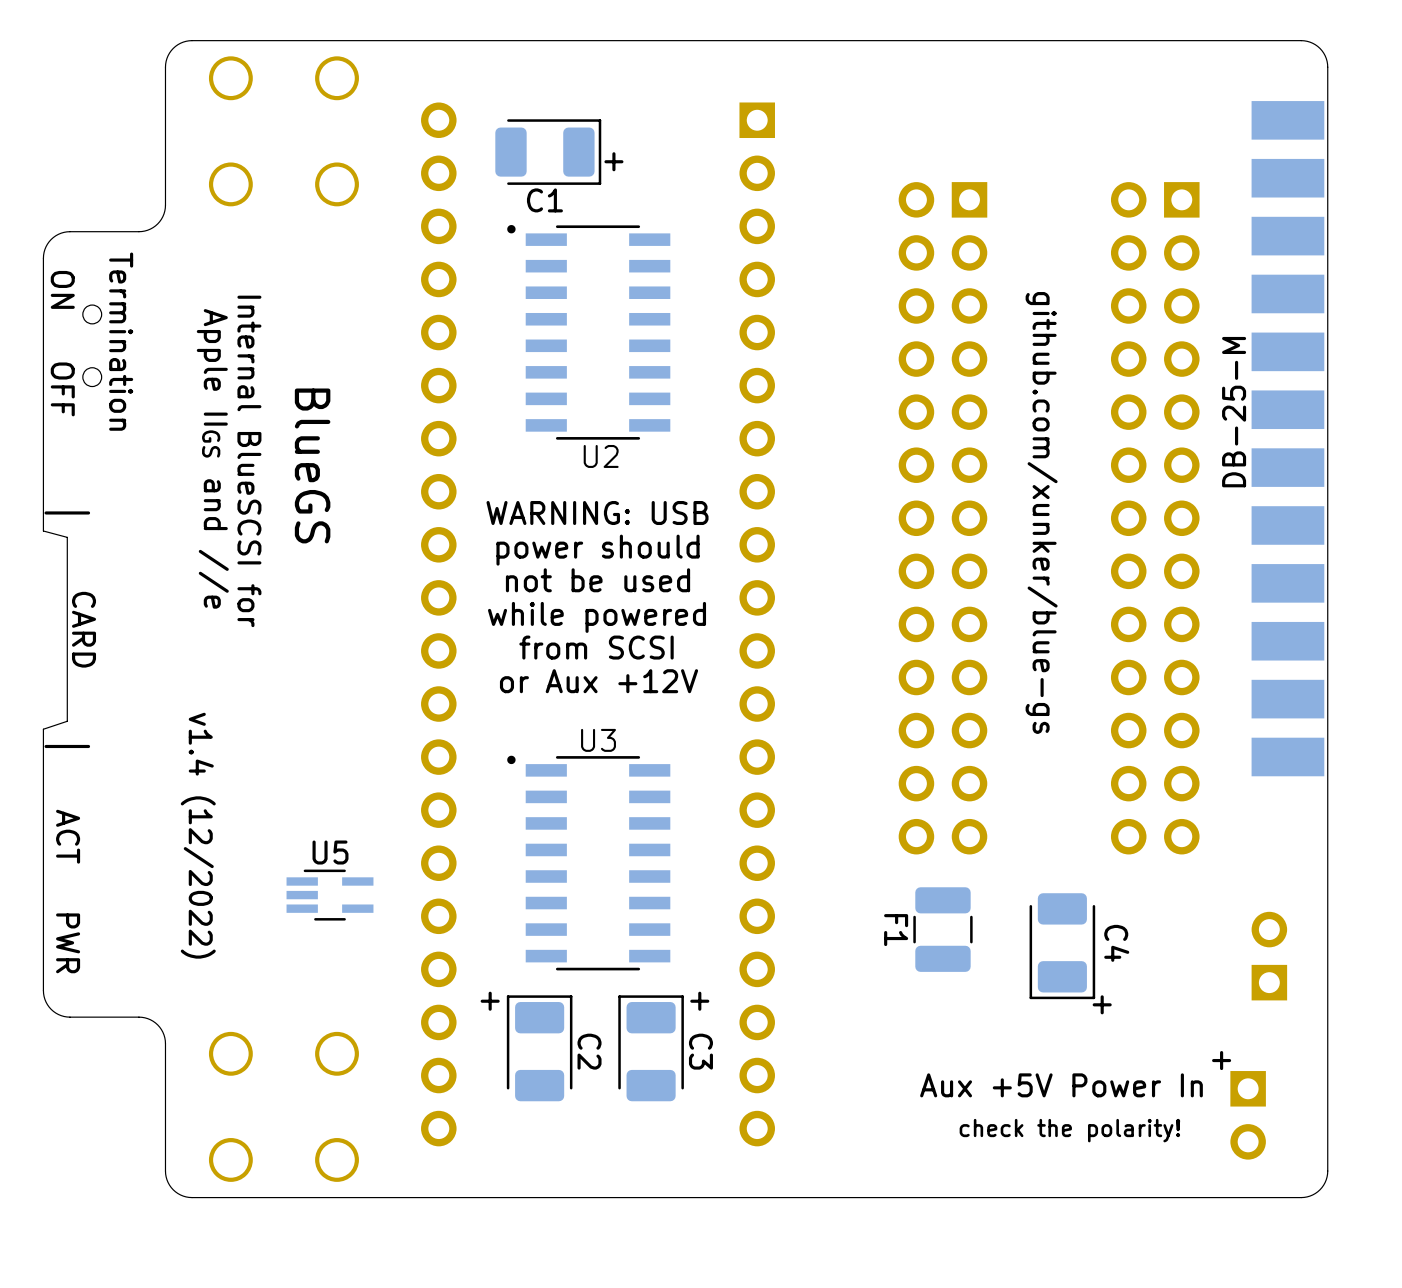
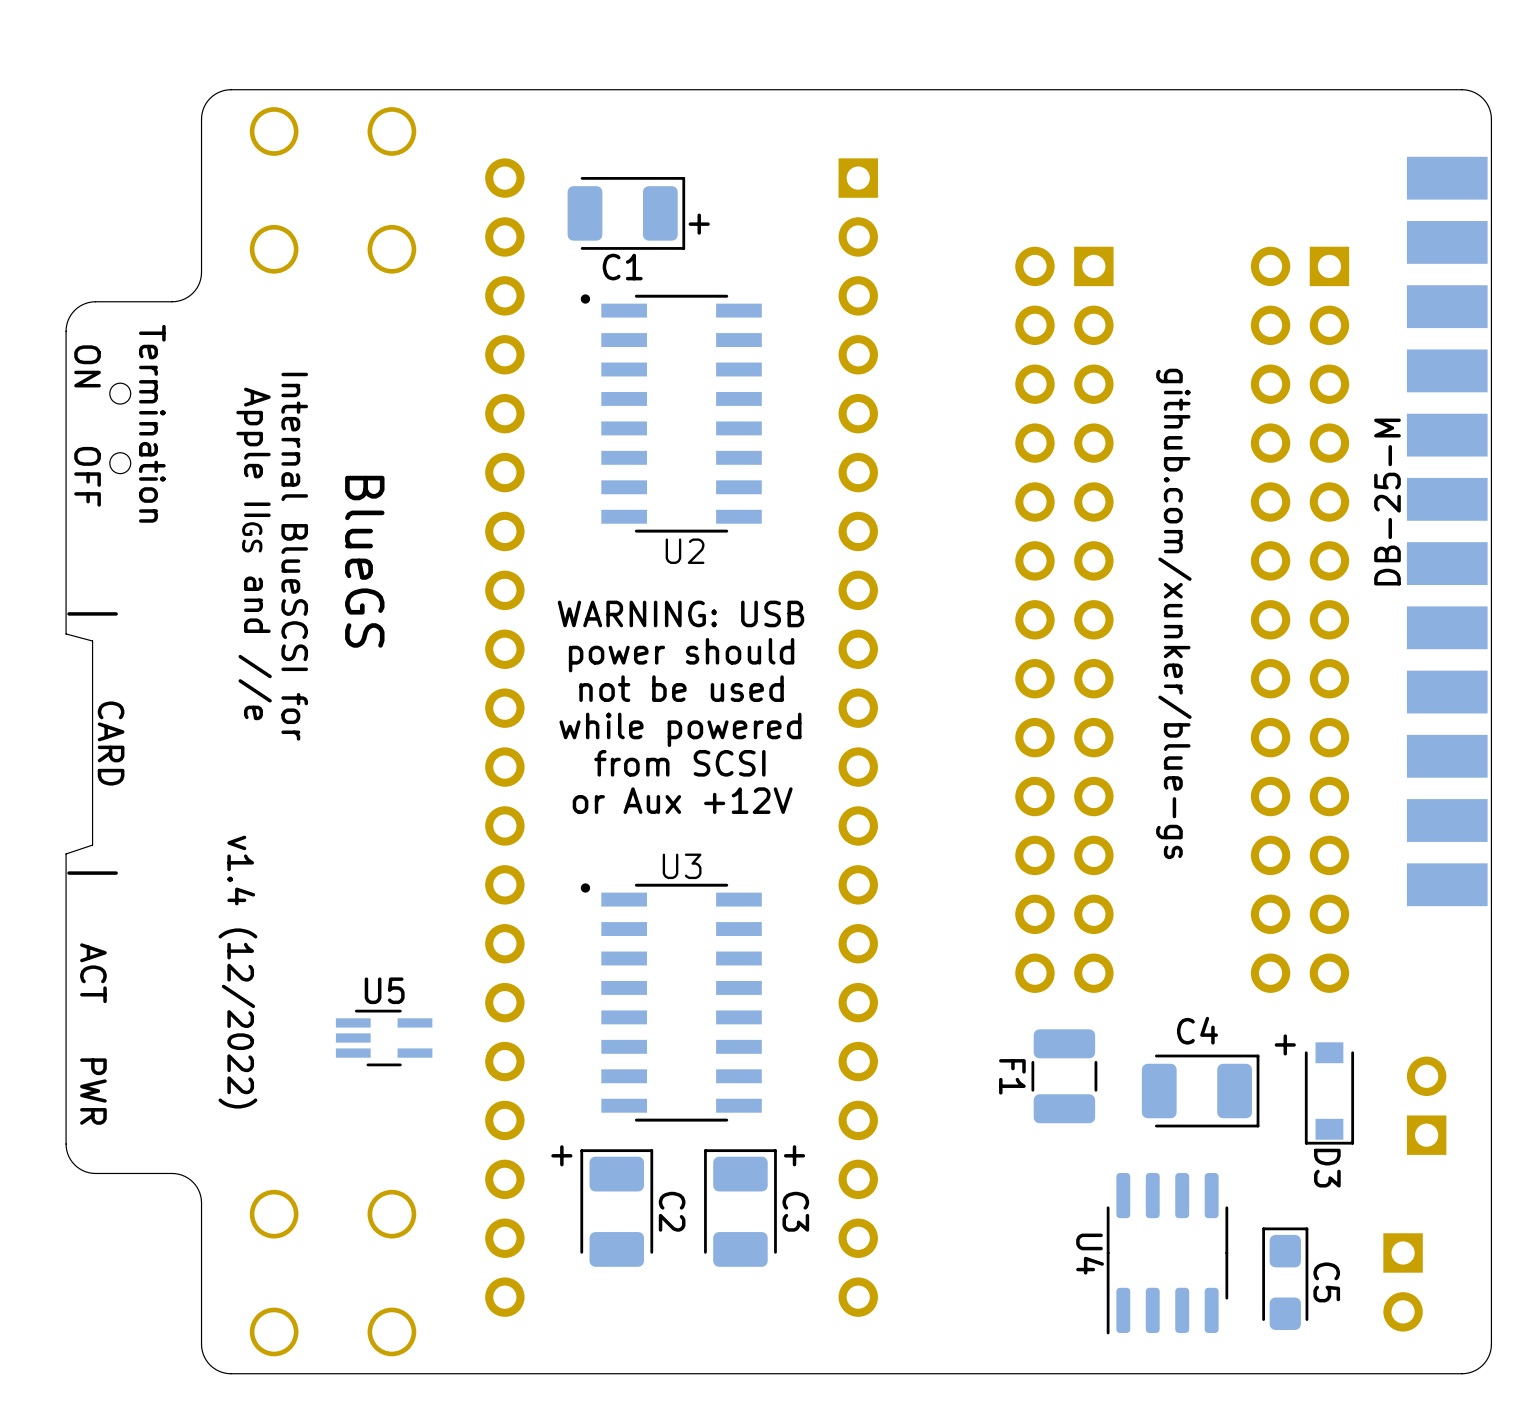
text: none -> + (1285, 1044)
D3: none -> (1329, 1093)
C4 rotation: 0° (1062, 946) -> 90° counterclockwise (1200, 1091)
text: + (1102, 1004) -> none
text: + (1221, 1060) -> none
text: Aux +5V Power In (1061, 1085) -> none
U4: none -> (1167, 1253)
C5: none -> (1285, 1278)
text: check the polarity! (1069, 1130) -> none

